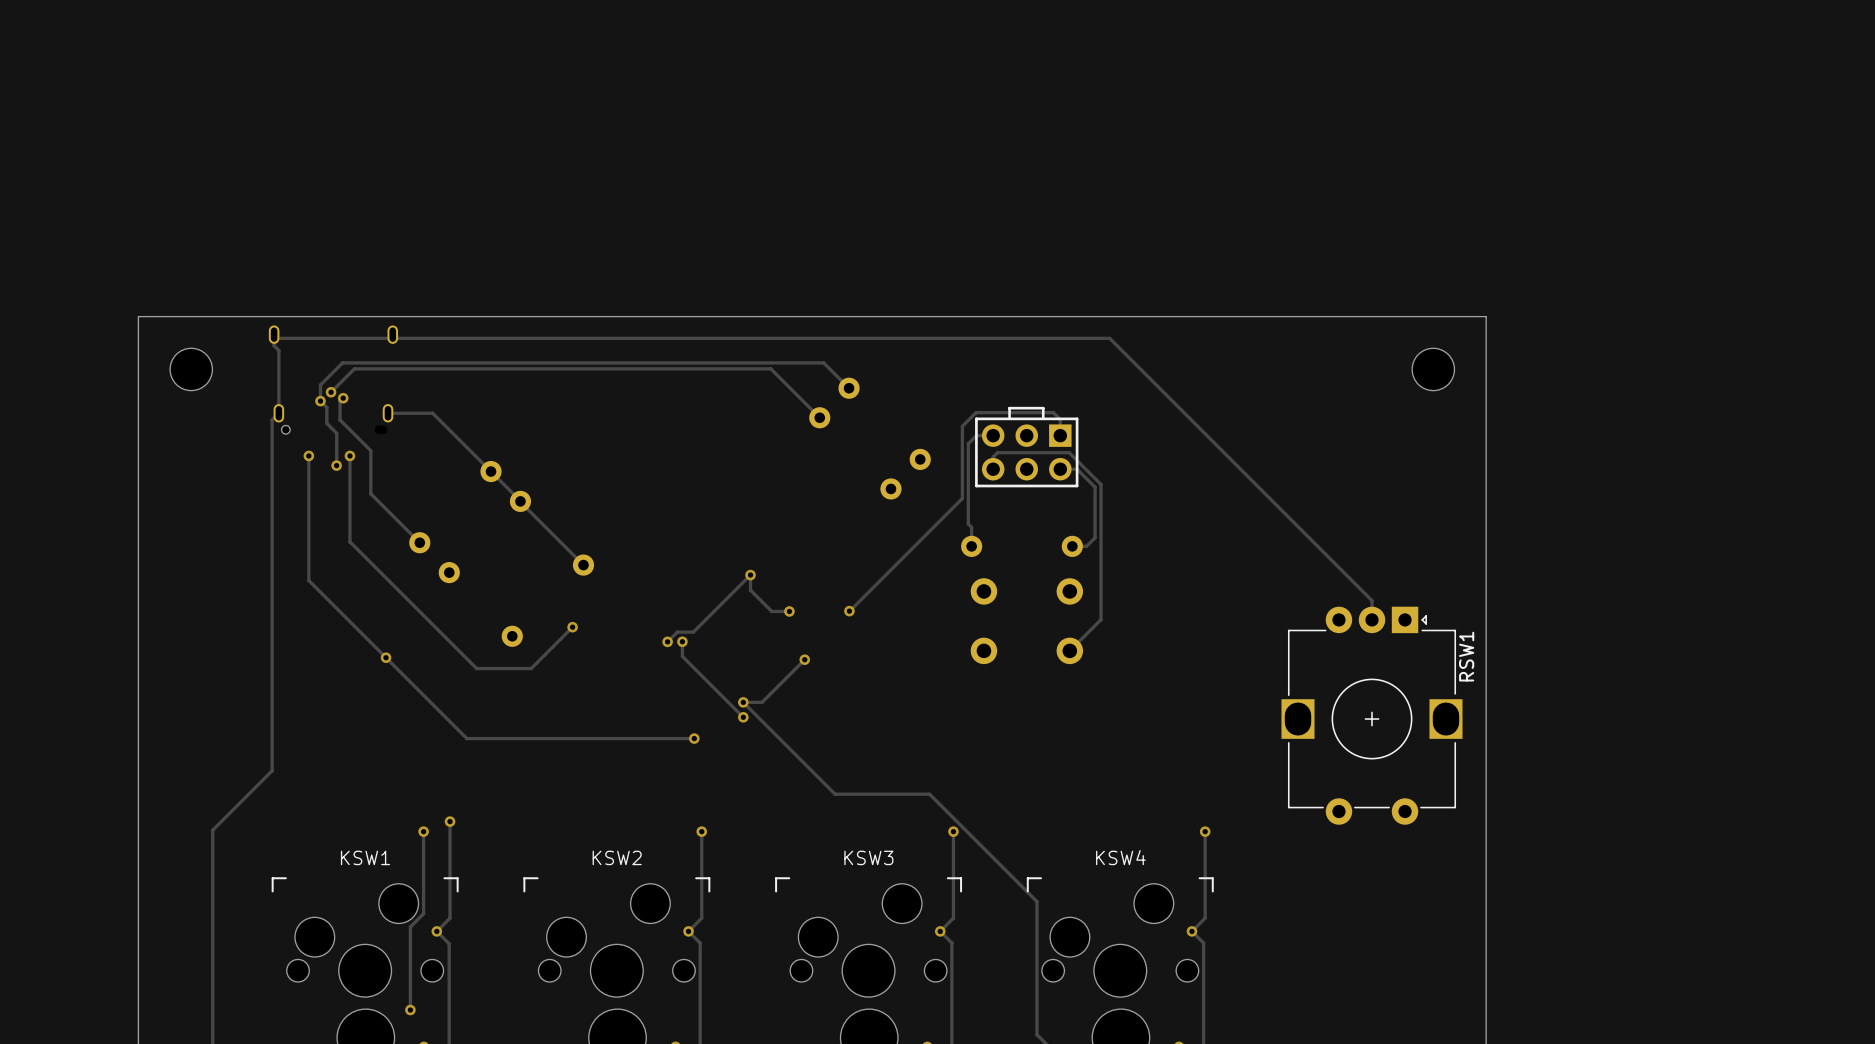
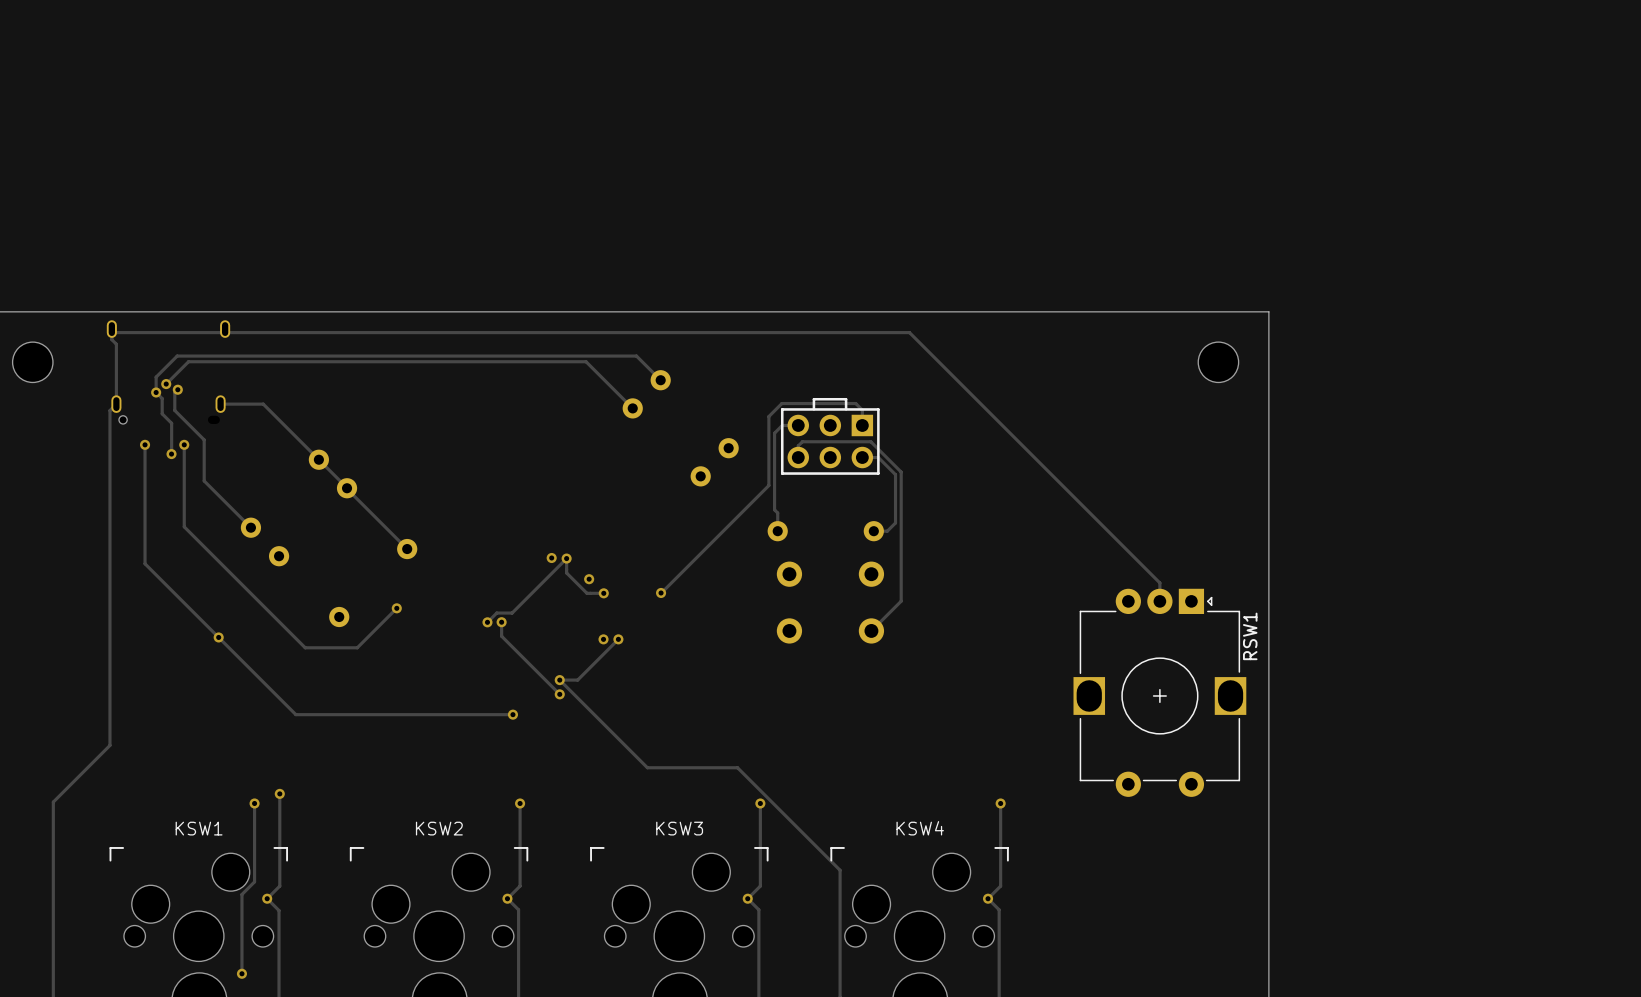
via: none -> (551, 558)
via: none -> (589, 579)
via: none -> (603, 639)

